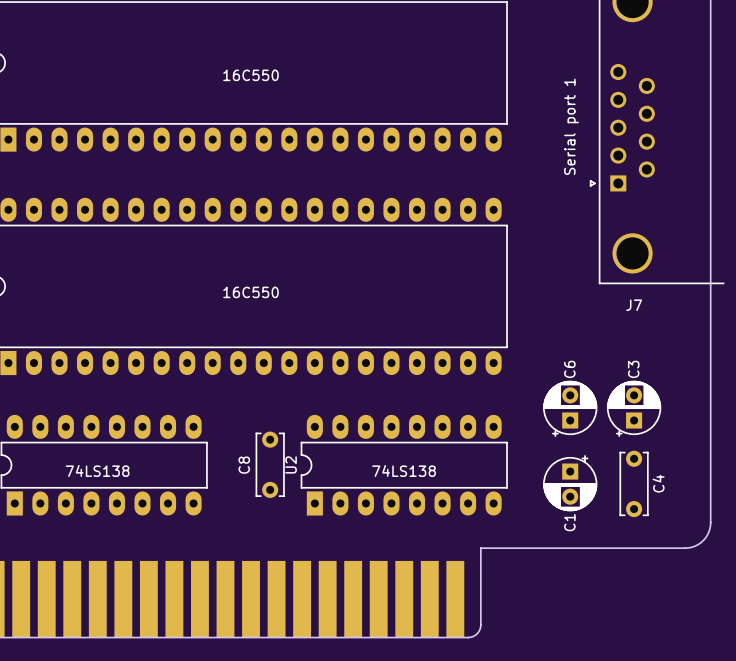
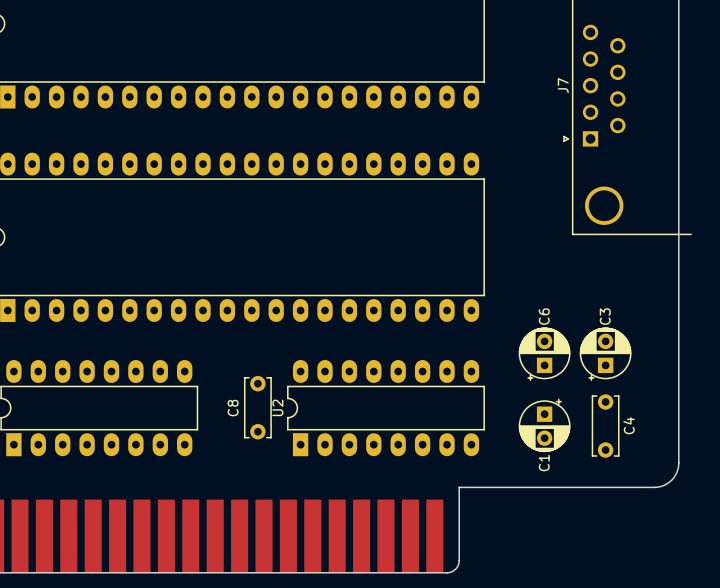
text: 16C550 (251, 75) -> none
text: Serial port 1 (571, 126) -> none
text: 16C550 (251, 292) -> none
J7 name rotation: 0° (634, 305) -> 90° counterclockwise (563, 85)
J7 name position: J7 (634, 305) -> J7 (563, 85)
text: 74LS138 (97, 470) -> none
text: 74LS138 (404, 470) -> none

